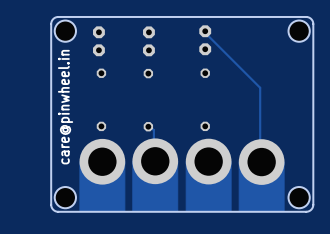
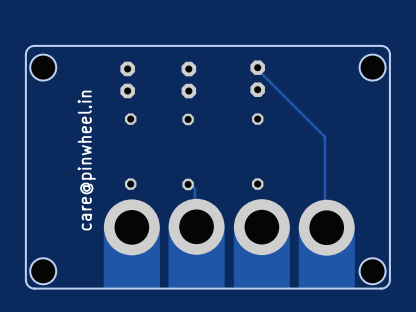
board edge: (313, 24) (311, 19) (306, 16) (53, 18) (51, 24) (51, 204) (53, 209) (58, 211) -> (389, 58) (388, 50) (381, 45) (34, 45) (29, 47) (25, 54) (26, 282) (33, 288) (77, 288)
hole position: (65, 31) -> (43, 67)
hole position: (65, 197) -> (43, 271)

